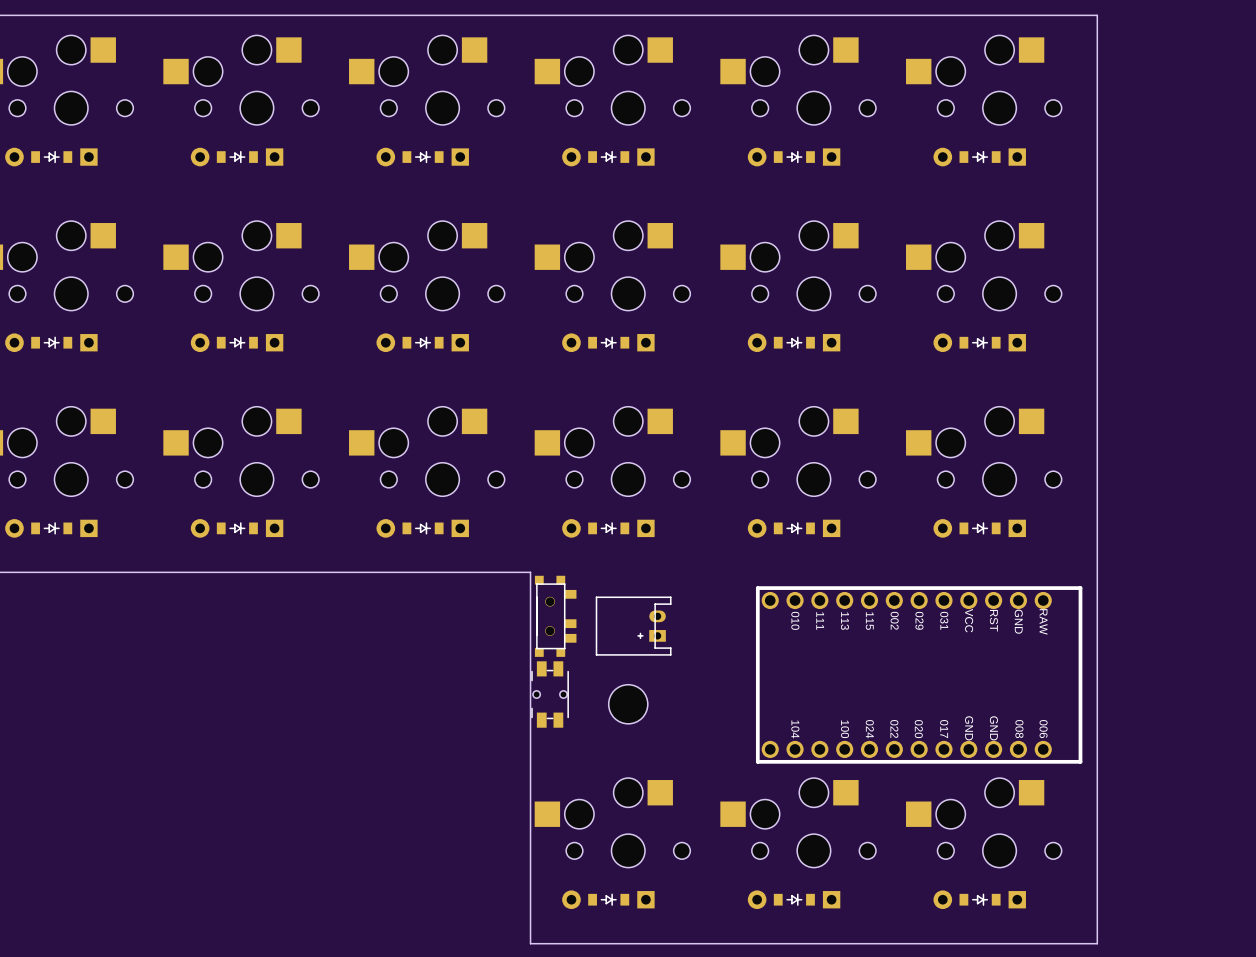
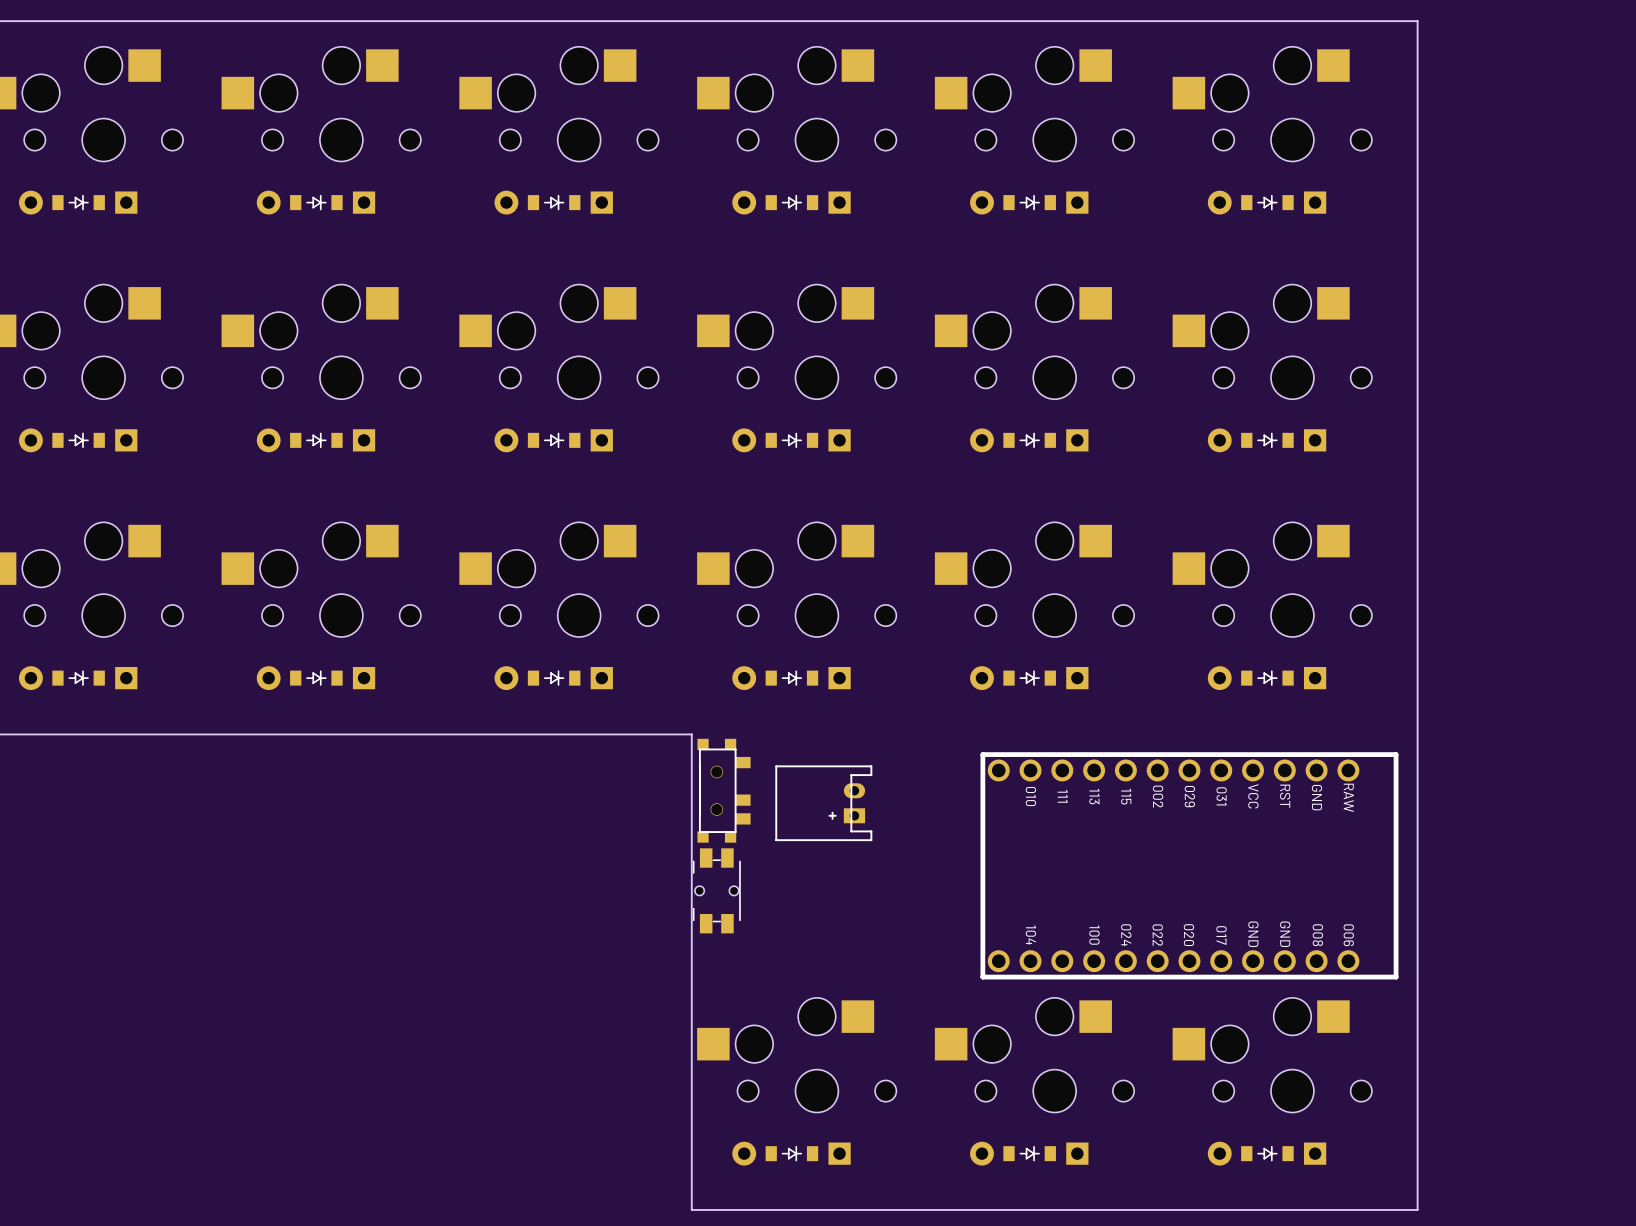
part: (628, 704) -> none

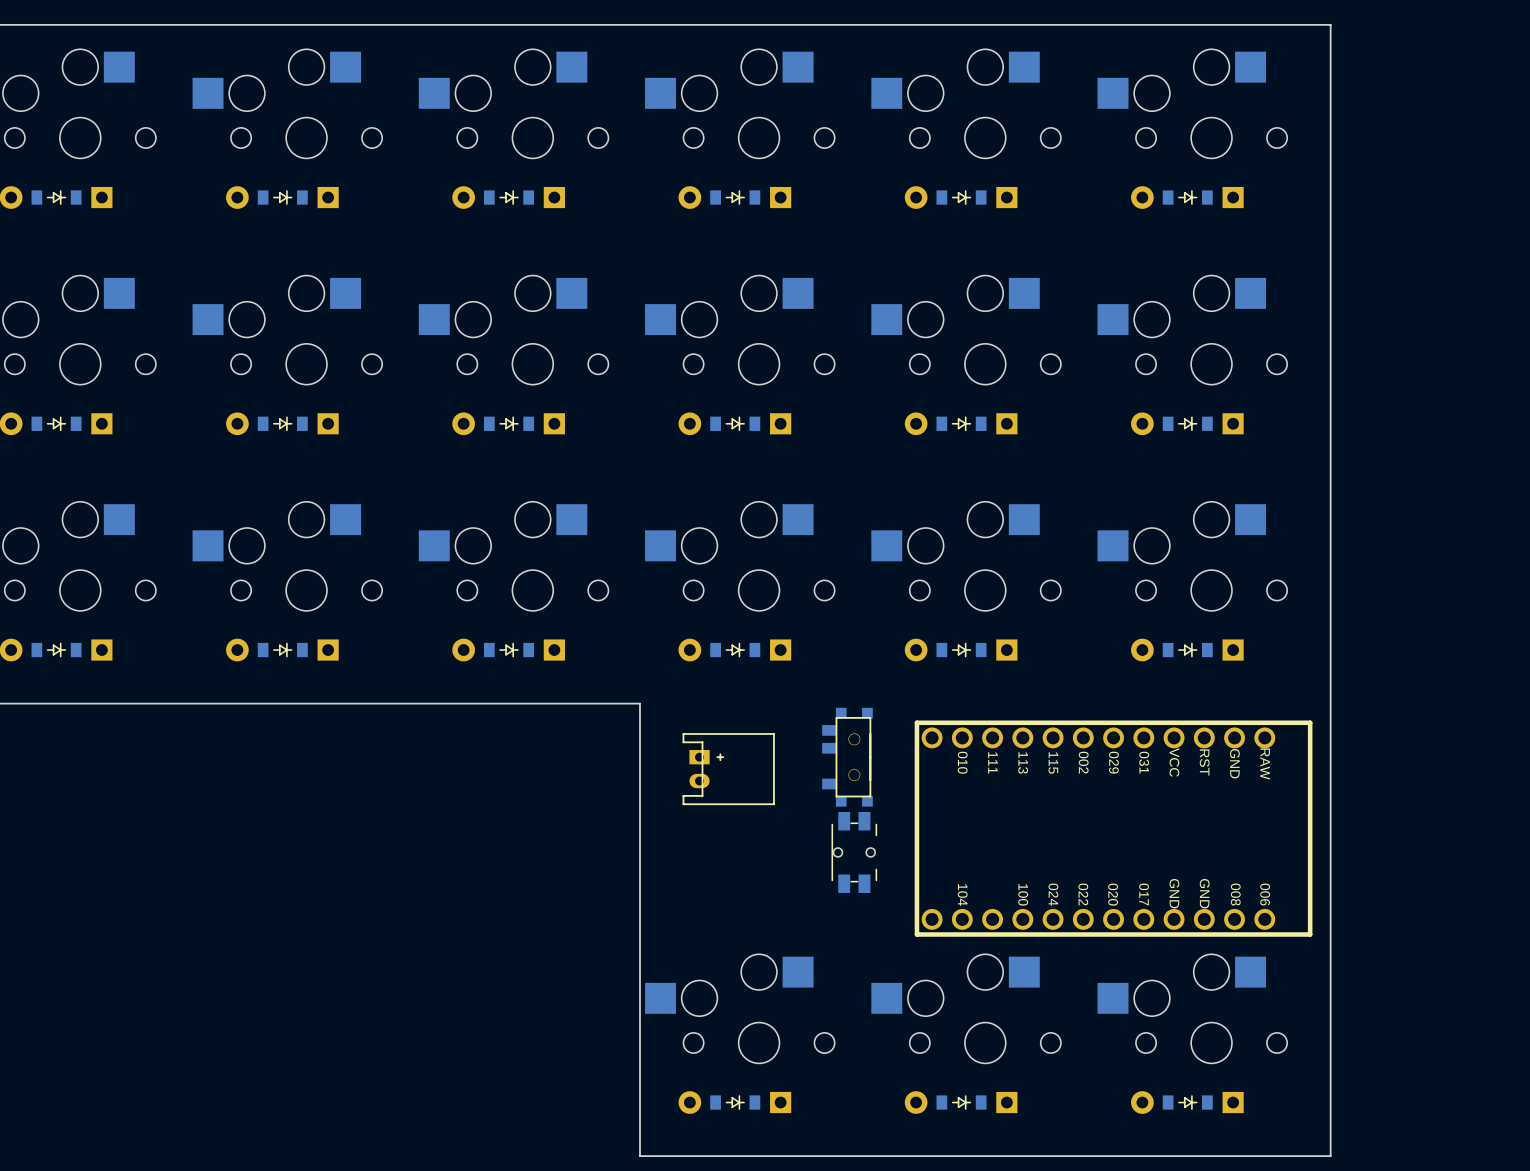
part rotation: 0° (724, 790) -> 180° (847, 757)
part position: (724, 790) -> (847, 757)
part rotation: 0° (823, 803) -> 180° (728, 769)
part rotation: 0° (716, 890) -> 180° (854, 852)
part position: (716, 890) -> (854, 852)

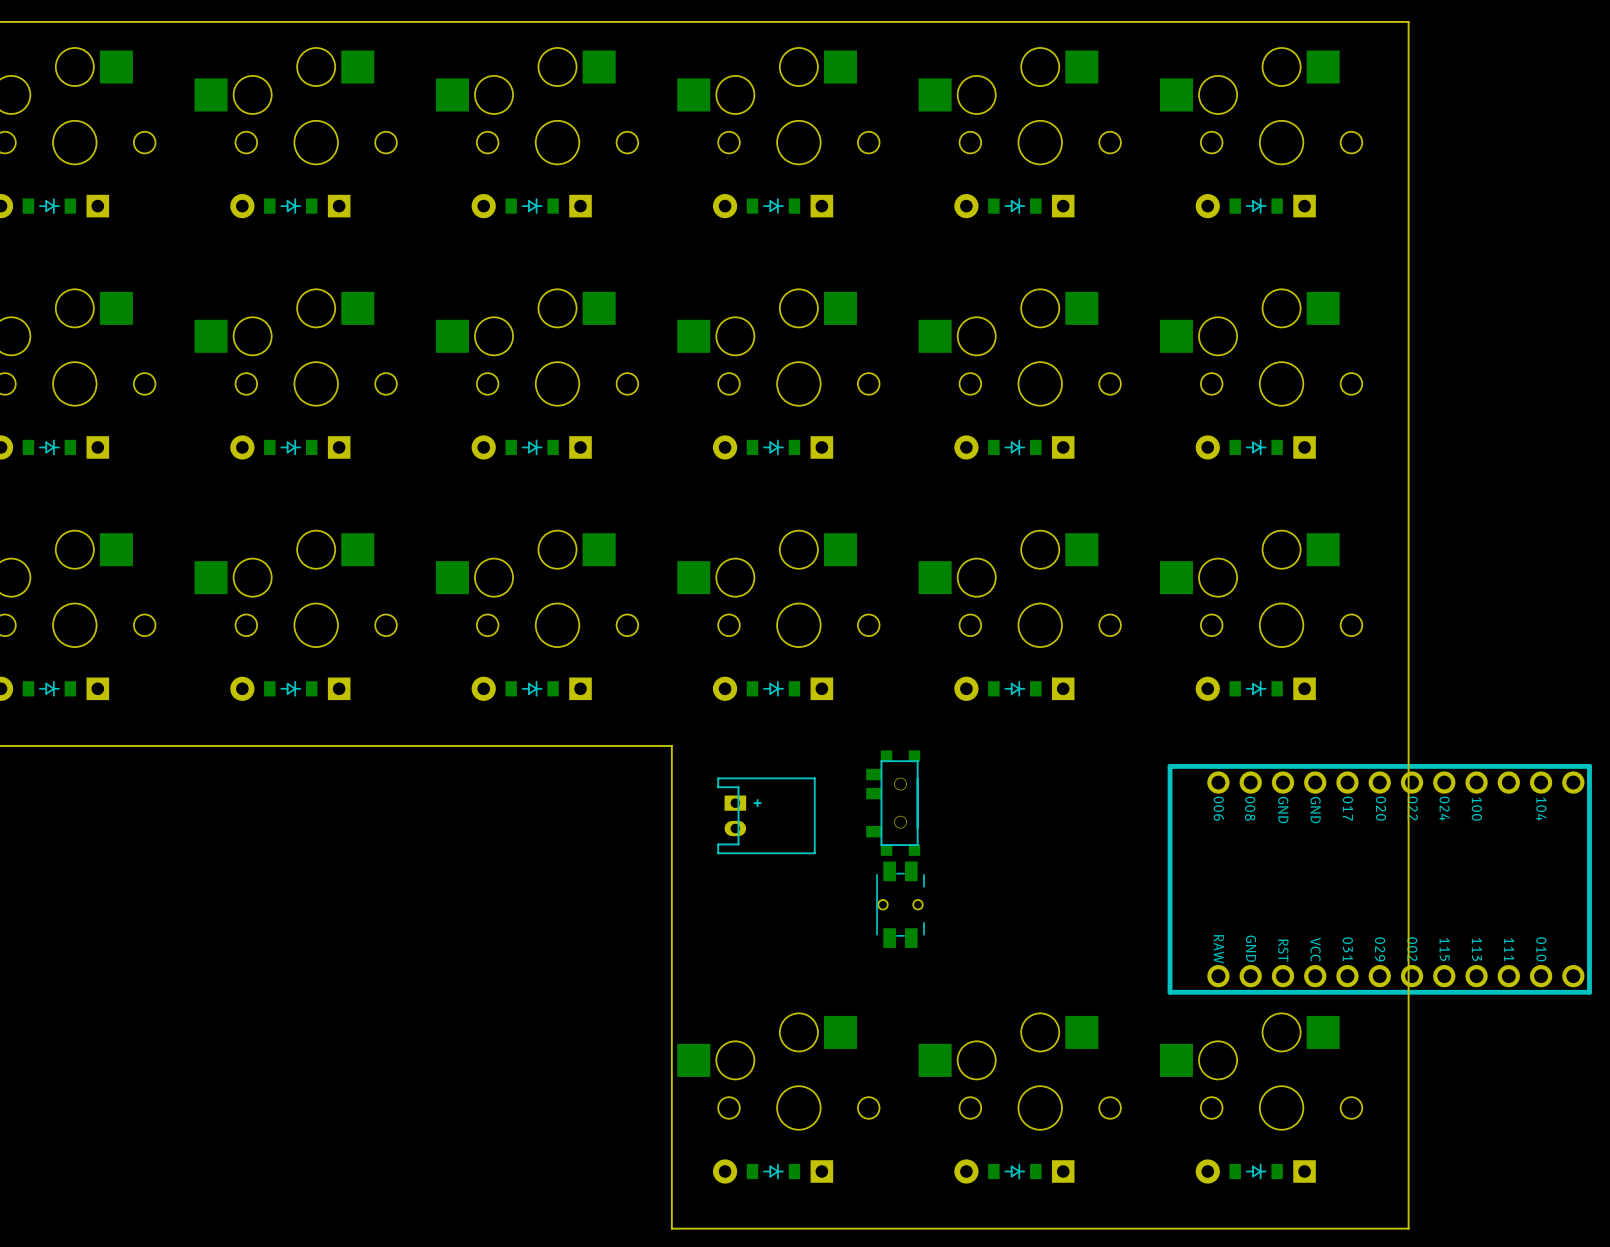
part rotation: 0° (1113, 828) -> 180° (1379, 879)

